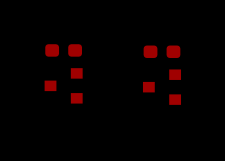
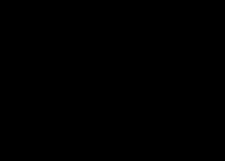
part: (63, 50) -> none
part: (161, 51) -> none
part: (63, 85) -> none
part: (161, 87) -> none

